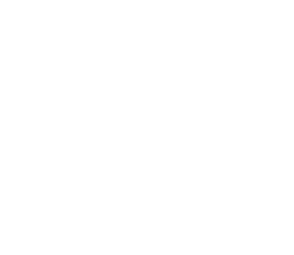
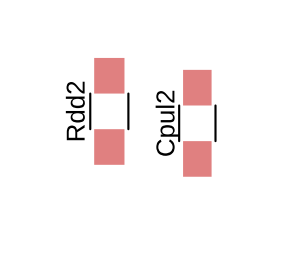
Rdd2: none -> (109, 111)
Cpul2: none -> (197, 123)

